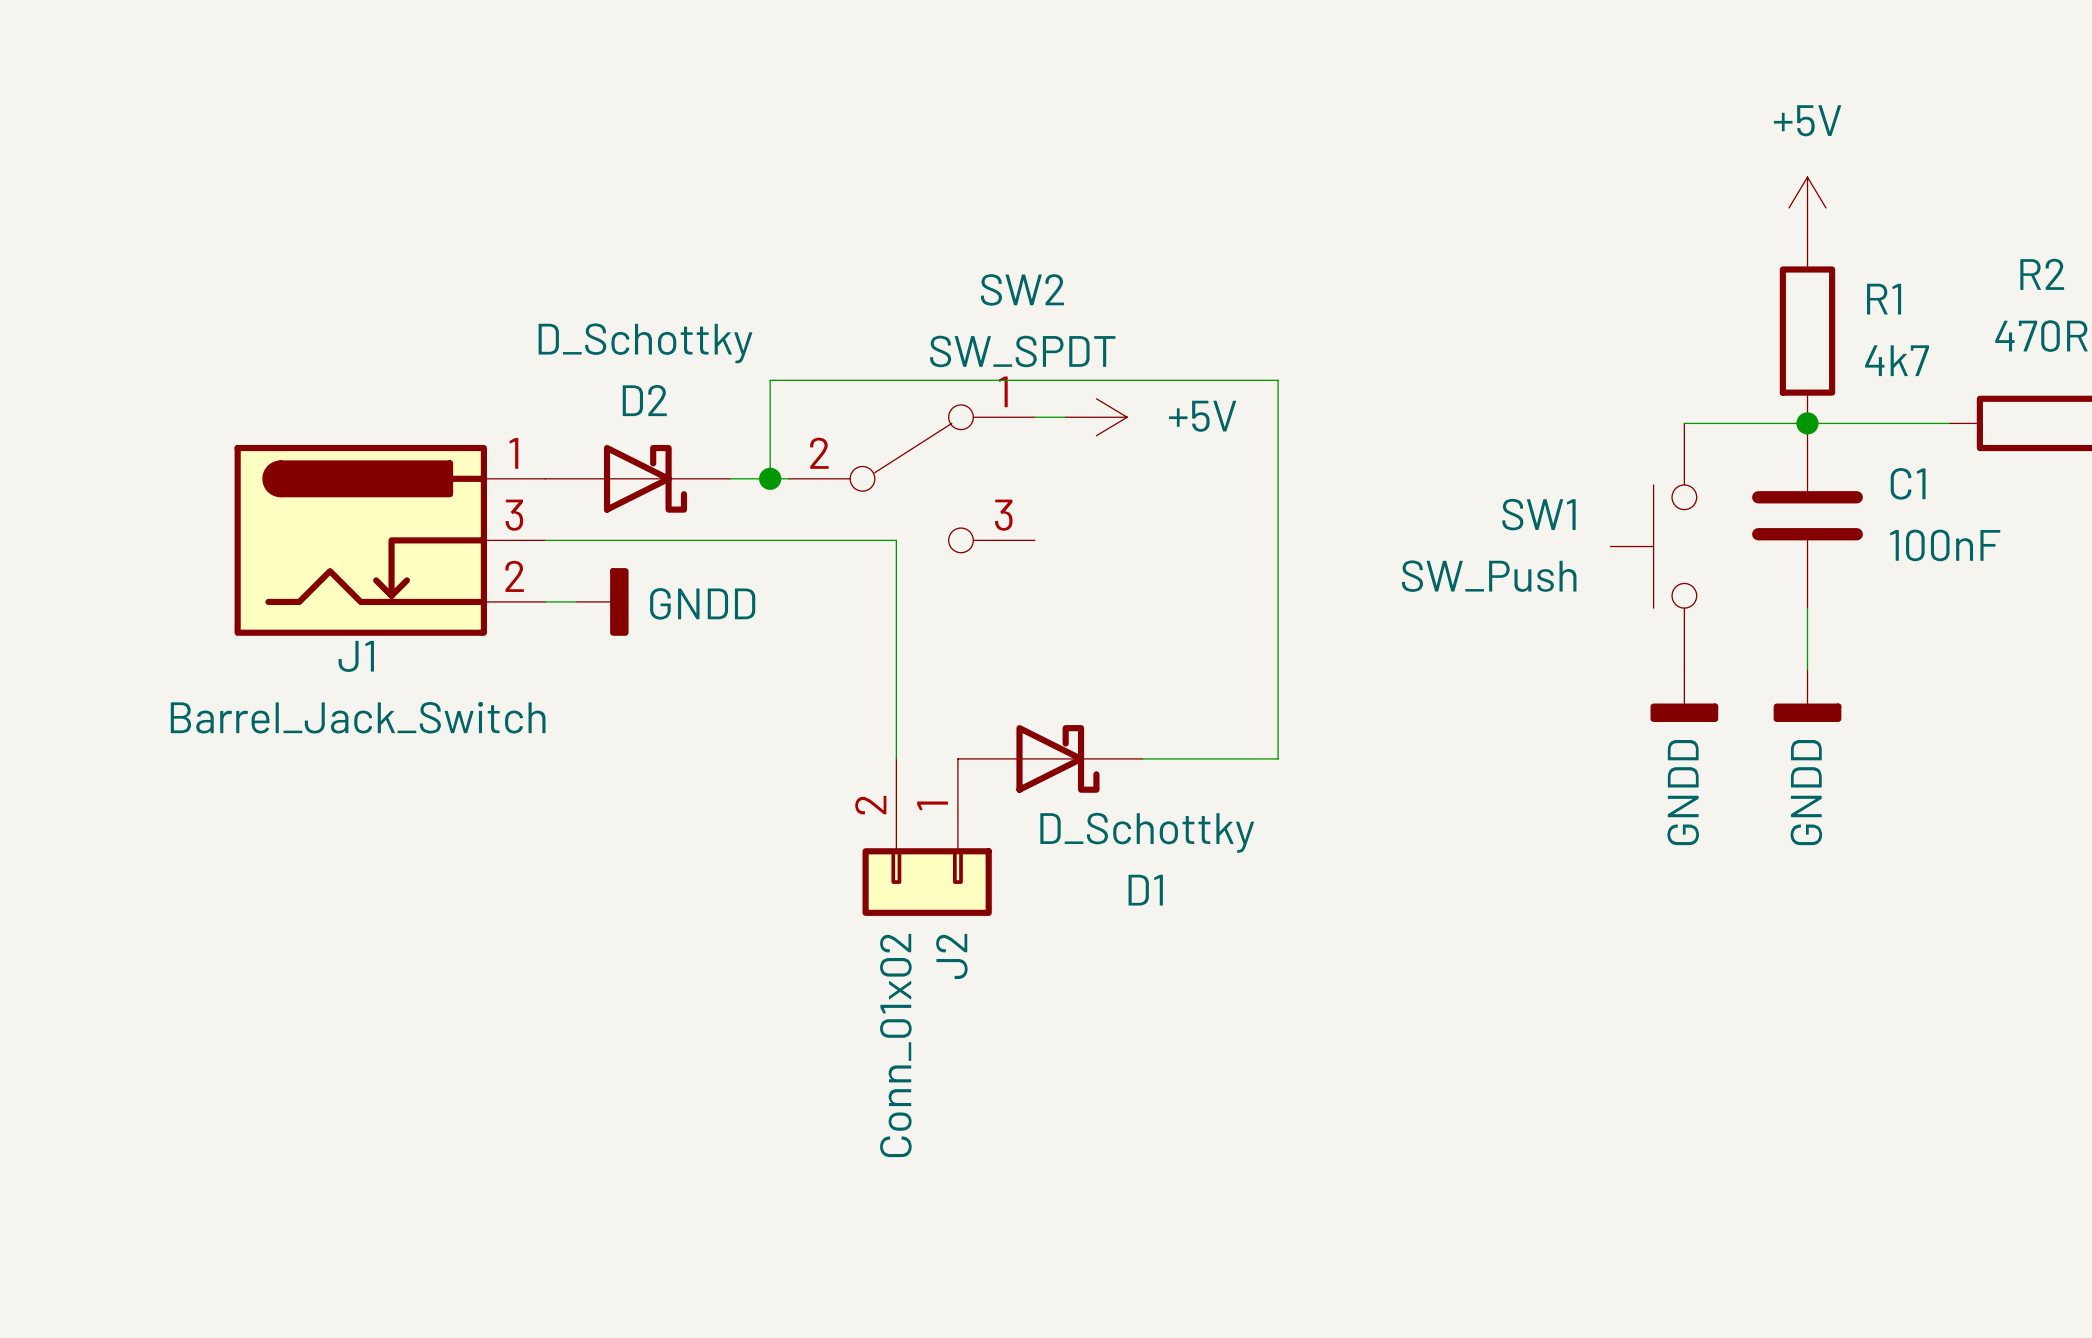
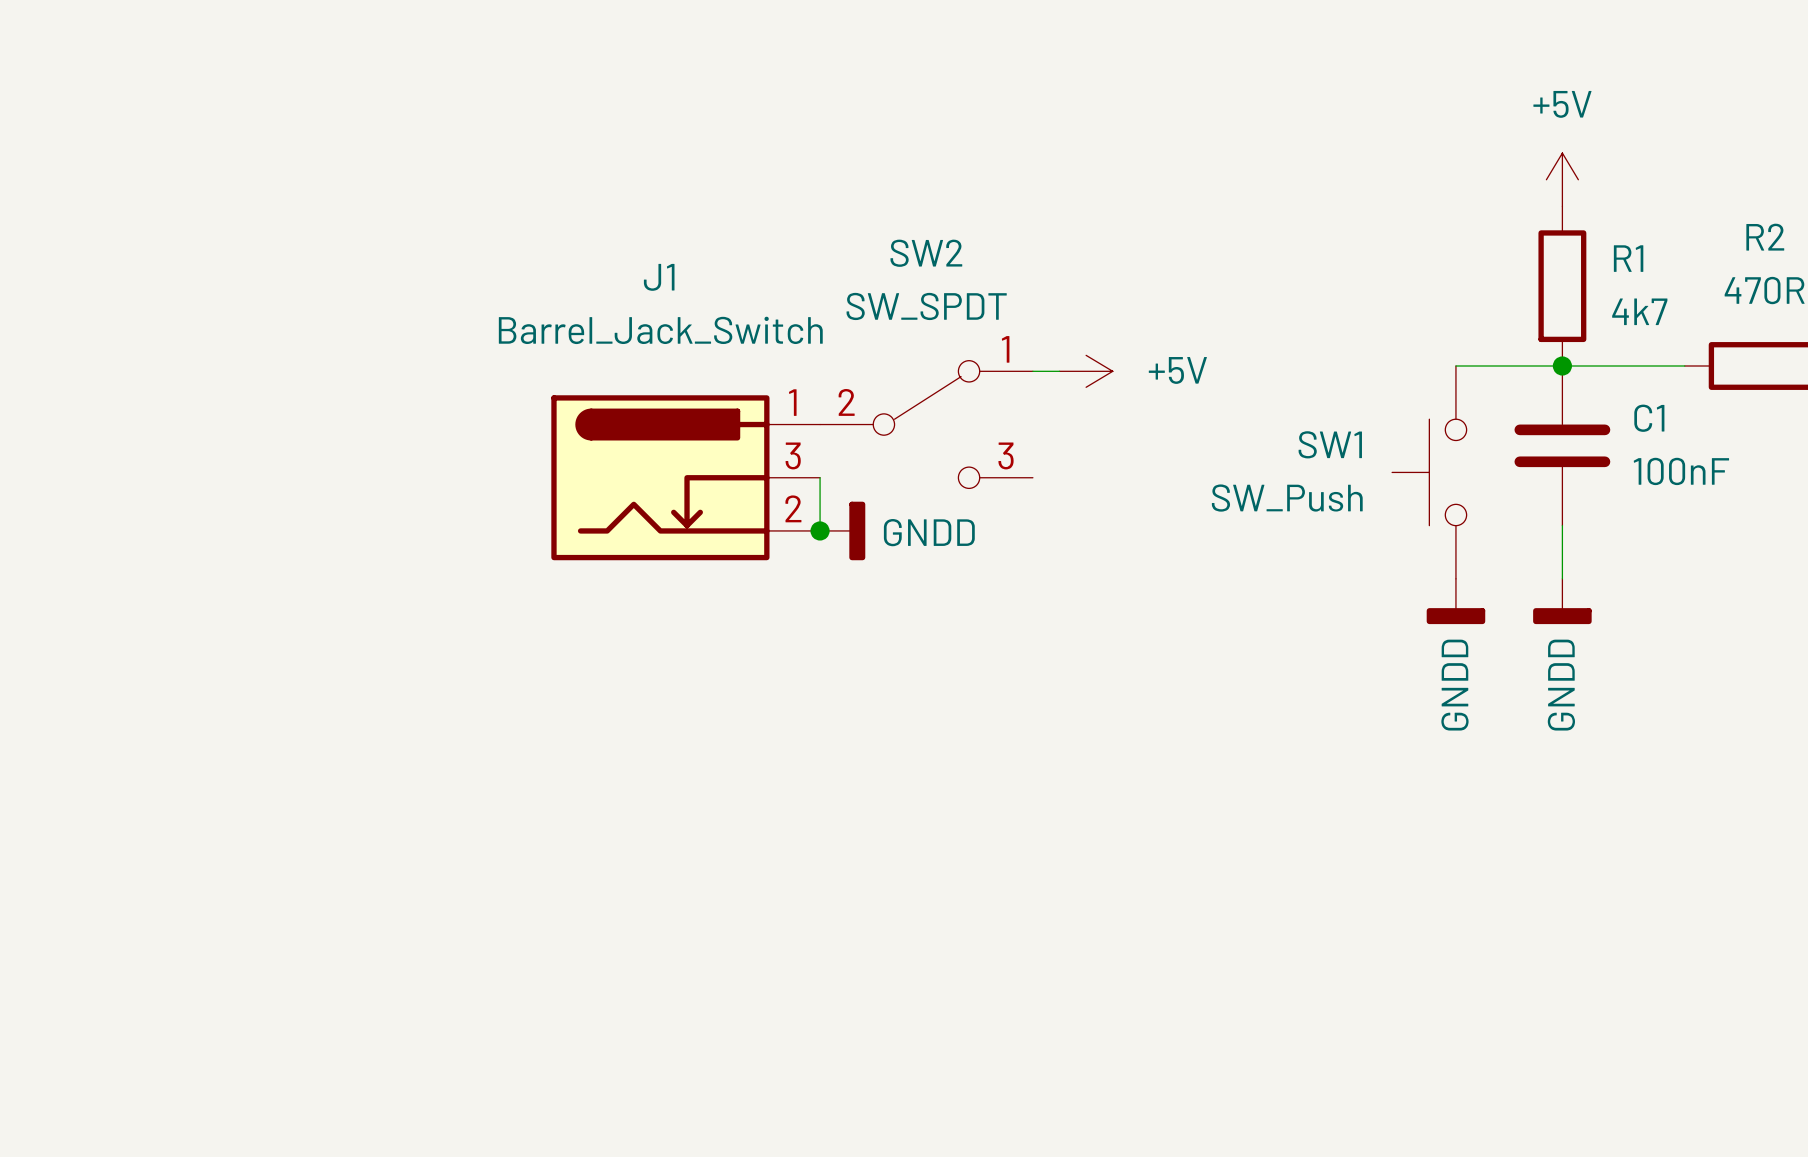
SW2 name position: SW2 (1022, 289) -> SW2 (926, 253)
SW2 value position: SW_SPDT (1022, 351) -> SW_SPDT (926, 306)
wire: (1034, 417) (1065, 417) -> (1032, 371) (1059, 371)
power symbol position: +5V (1096, 417) -> +5V (1086, 371)
D2: D_Schottky (637, 478) -> none
wire: (770, 478) (770, 380) (1278, 380) (1278, 758) (1142, 758) -> none
junction: (770, 478) -> none
SW2 position: (911, 478) -> (926, 424)
J1 position: (390, 540) -> (685, 477)
wire: (545, 540) (896, 540) (896, 758) -> none
wire: none -> (820, 477) (820, 530)
wire: (545, 601) (576, 601) -> none
power symbol position: GNDD (602, 601) -> GNDD (842, 530)
junction: none -> (820, 530)
J1 name position: J1 (356, 656) -> J1 (659, 277)
J1 value position: Barrel_Jack_Switch (358, 717) -> Barrel_Jack_Switch (660, 330)
D1: D_Schottky (1050, 758) -> none
J2: Conn_01x02 (927, 837) -> none

